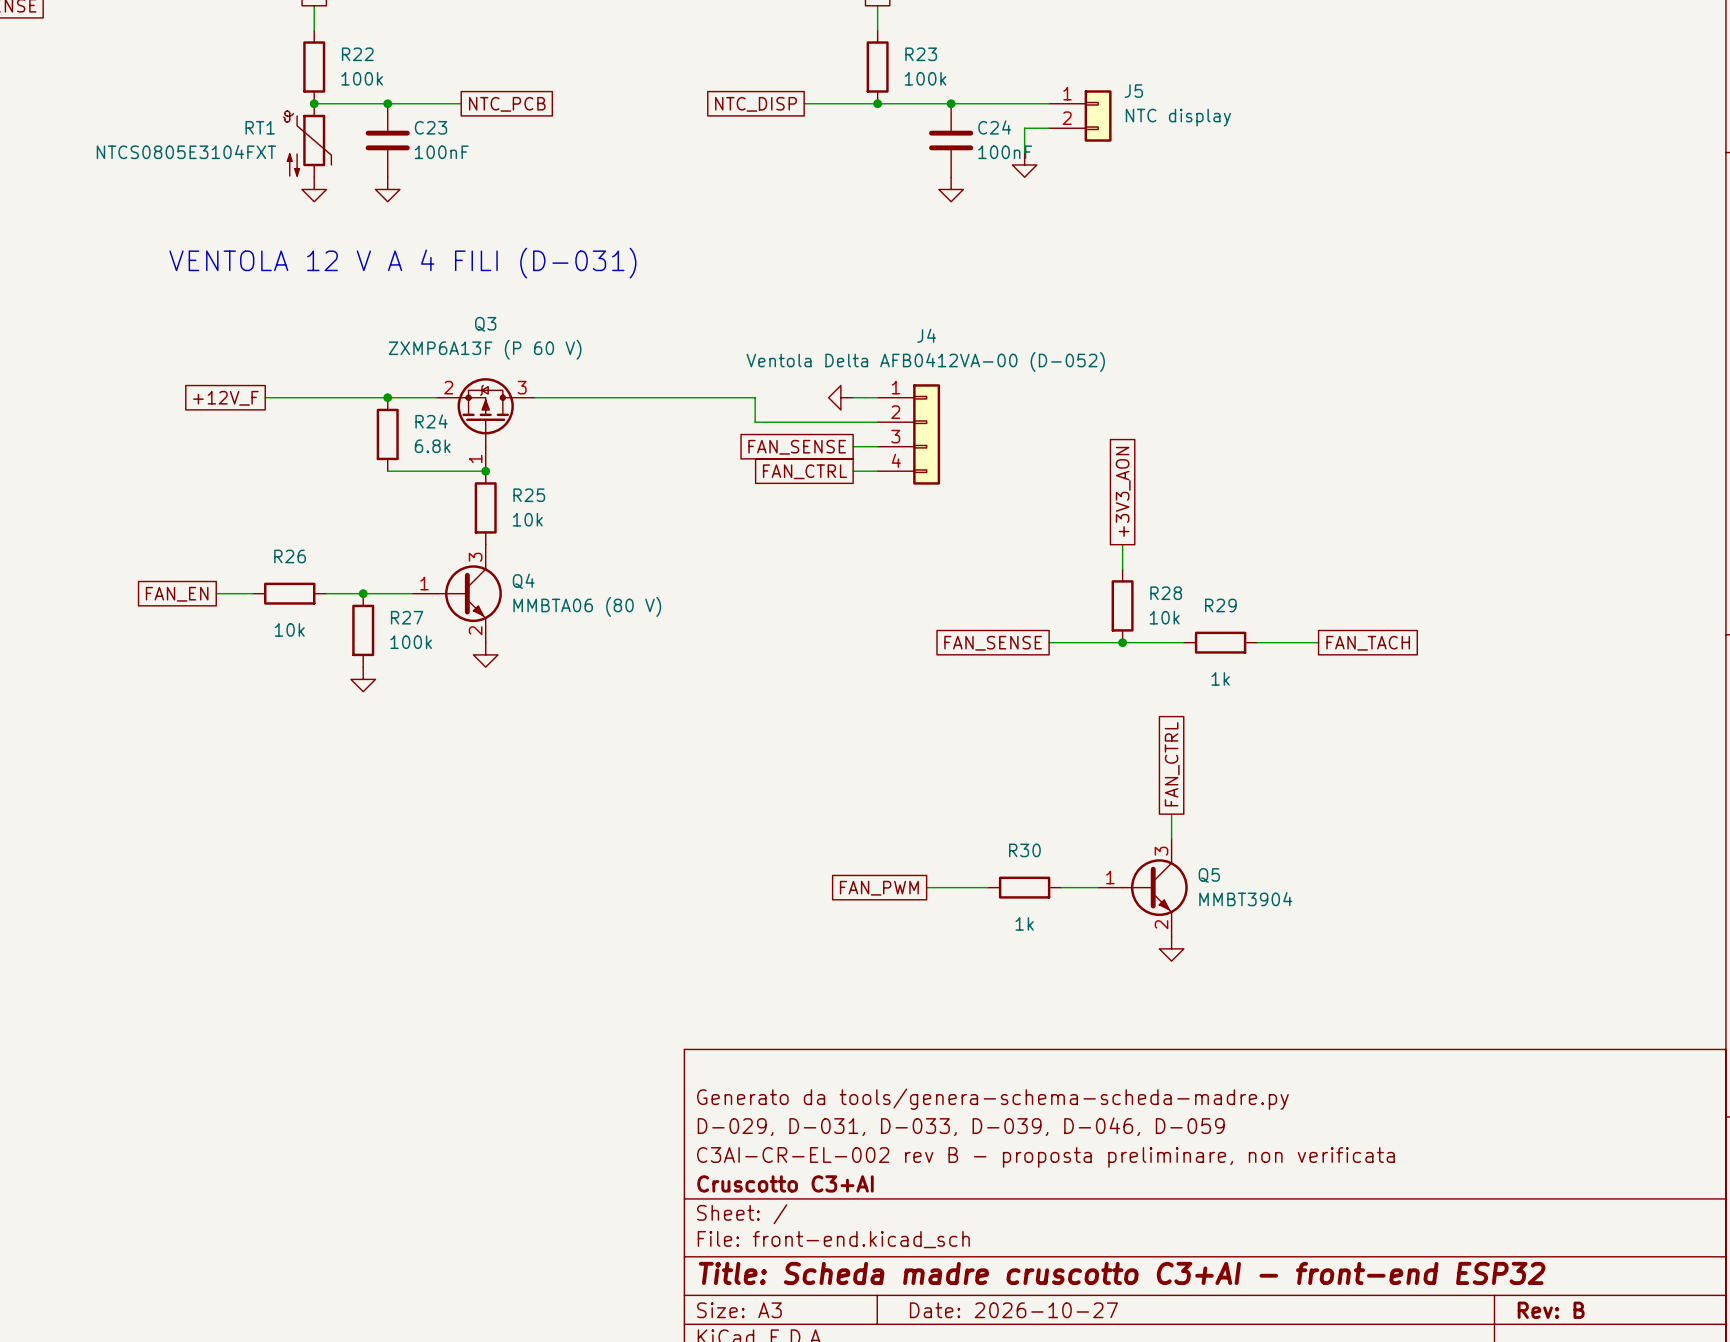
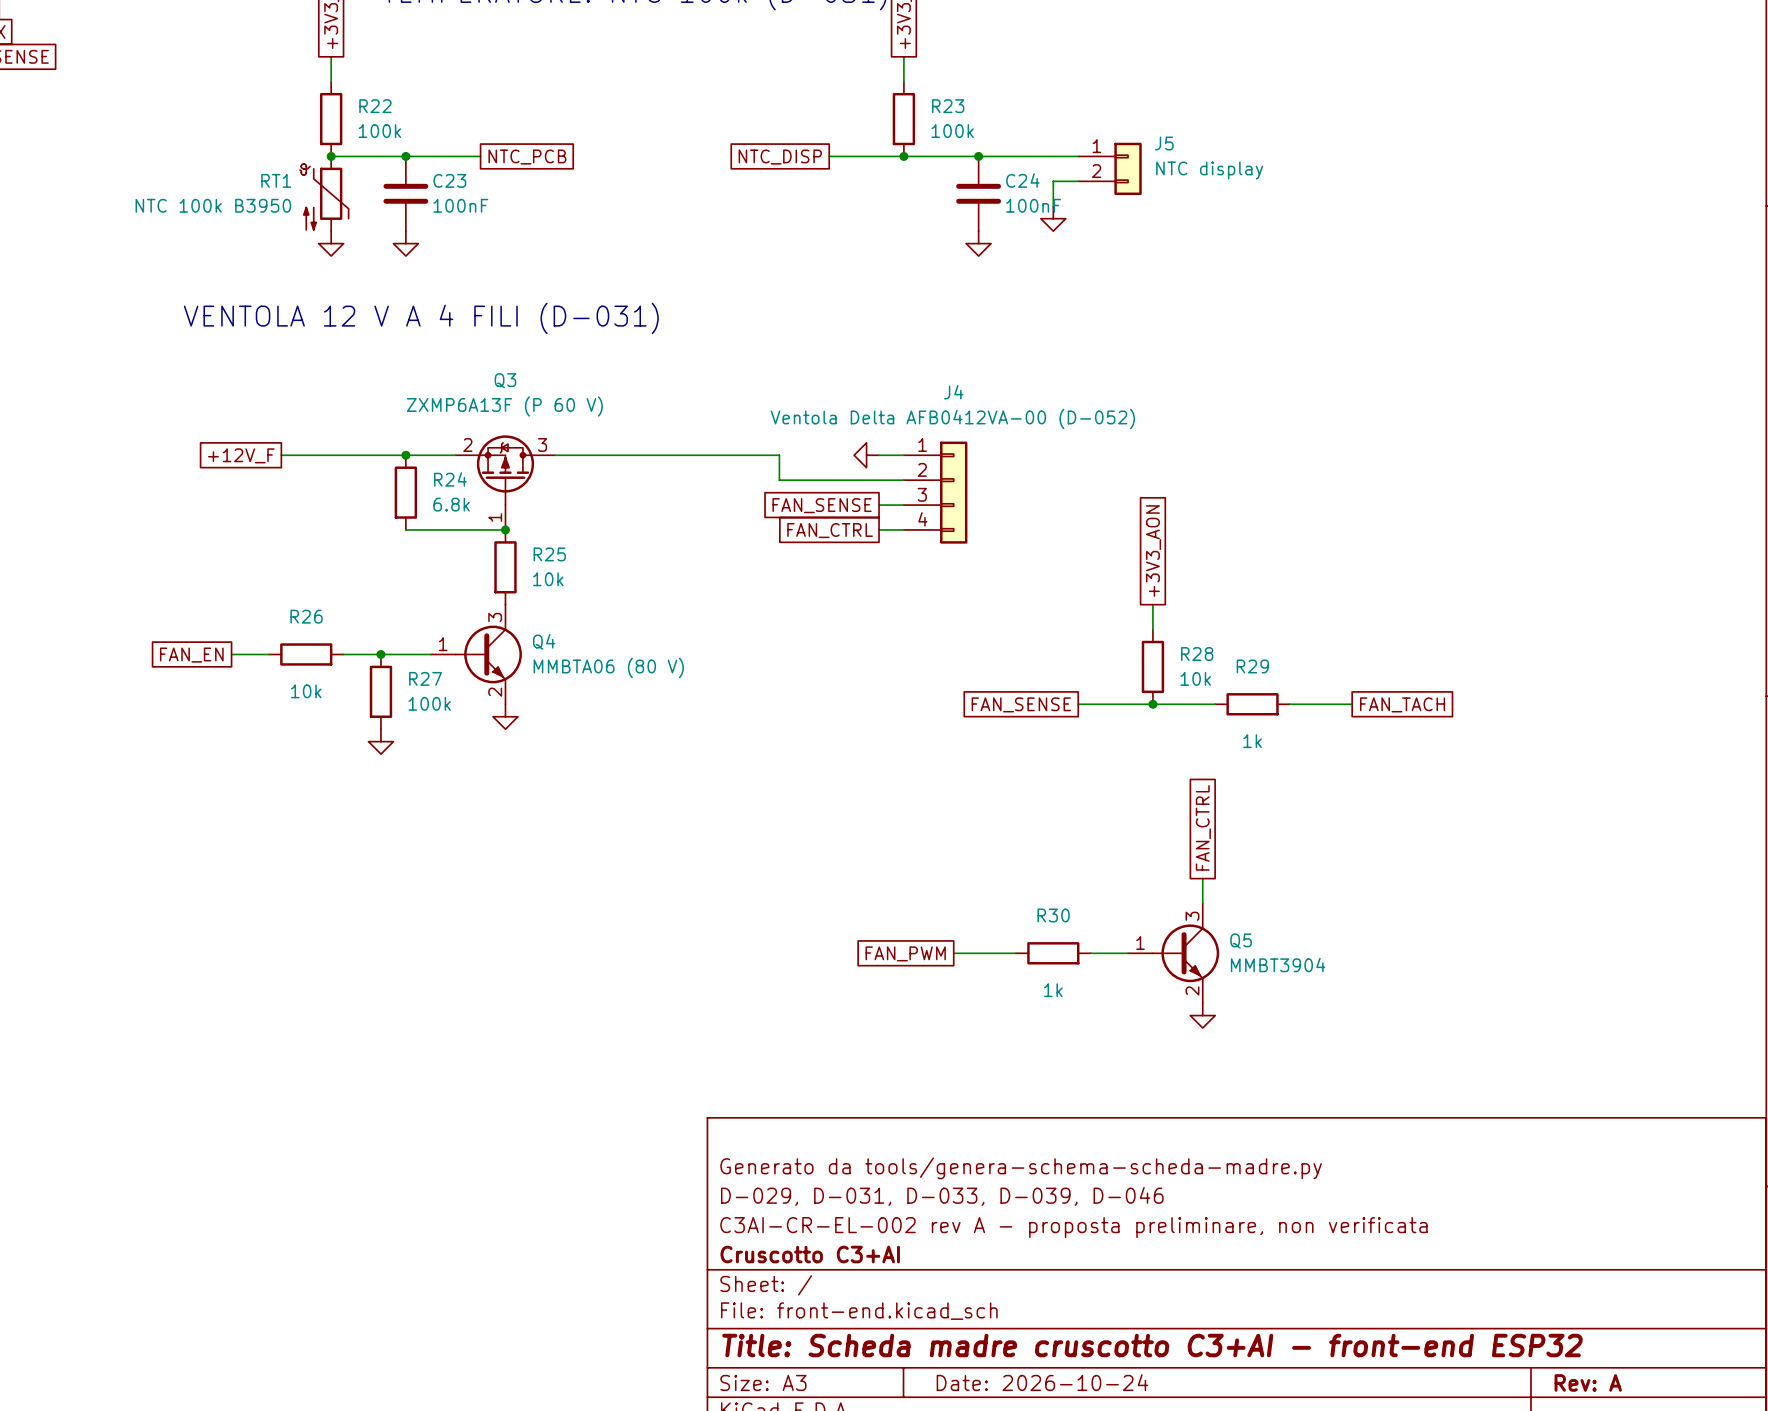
RT1 value: NTCS0805E3104FXT (186, 151) -> NTC 100k B3950 (213, 205)
title block: D-029, D-031, D-033, D-039, D-046, D-059 (961, 1126) -> D-029, D-031, D-033, D-039, D-046 (942, 1196)
title block: C3AI-CR-EL-002 rev B - proposta preliminare, non verificata (1045, 1157) -> C3AI-CR-EL-002 rev A - proposta preliminare, non verificata (1073, 1227)
title block: Date: 2026-10-27 (1013, 1310) -> Date: 2026-10-24 (1042, 1382)
title block: Rev: B (1551, 1310) -> Rev: A (1588, 1382)

